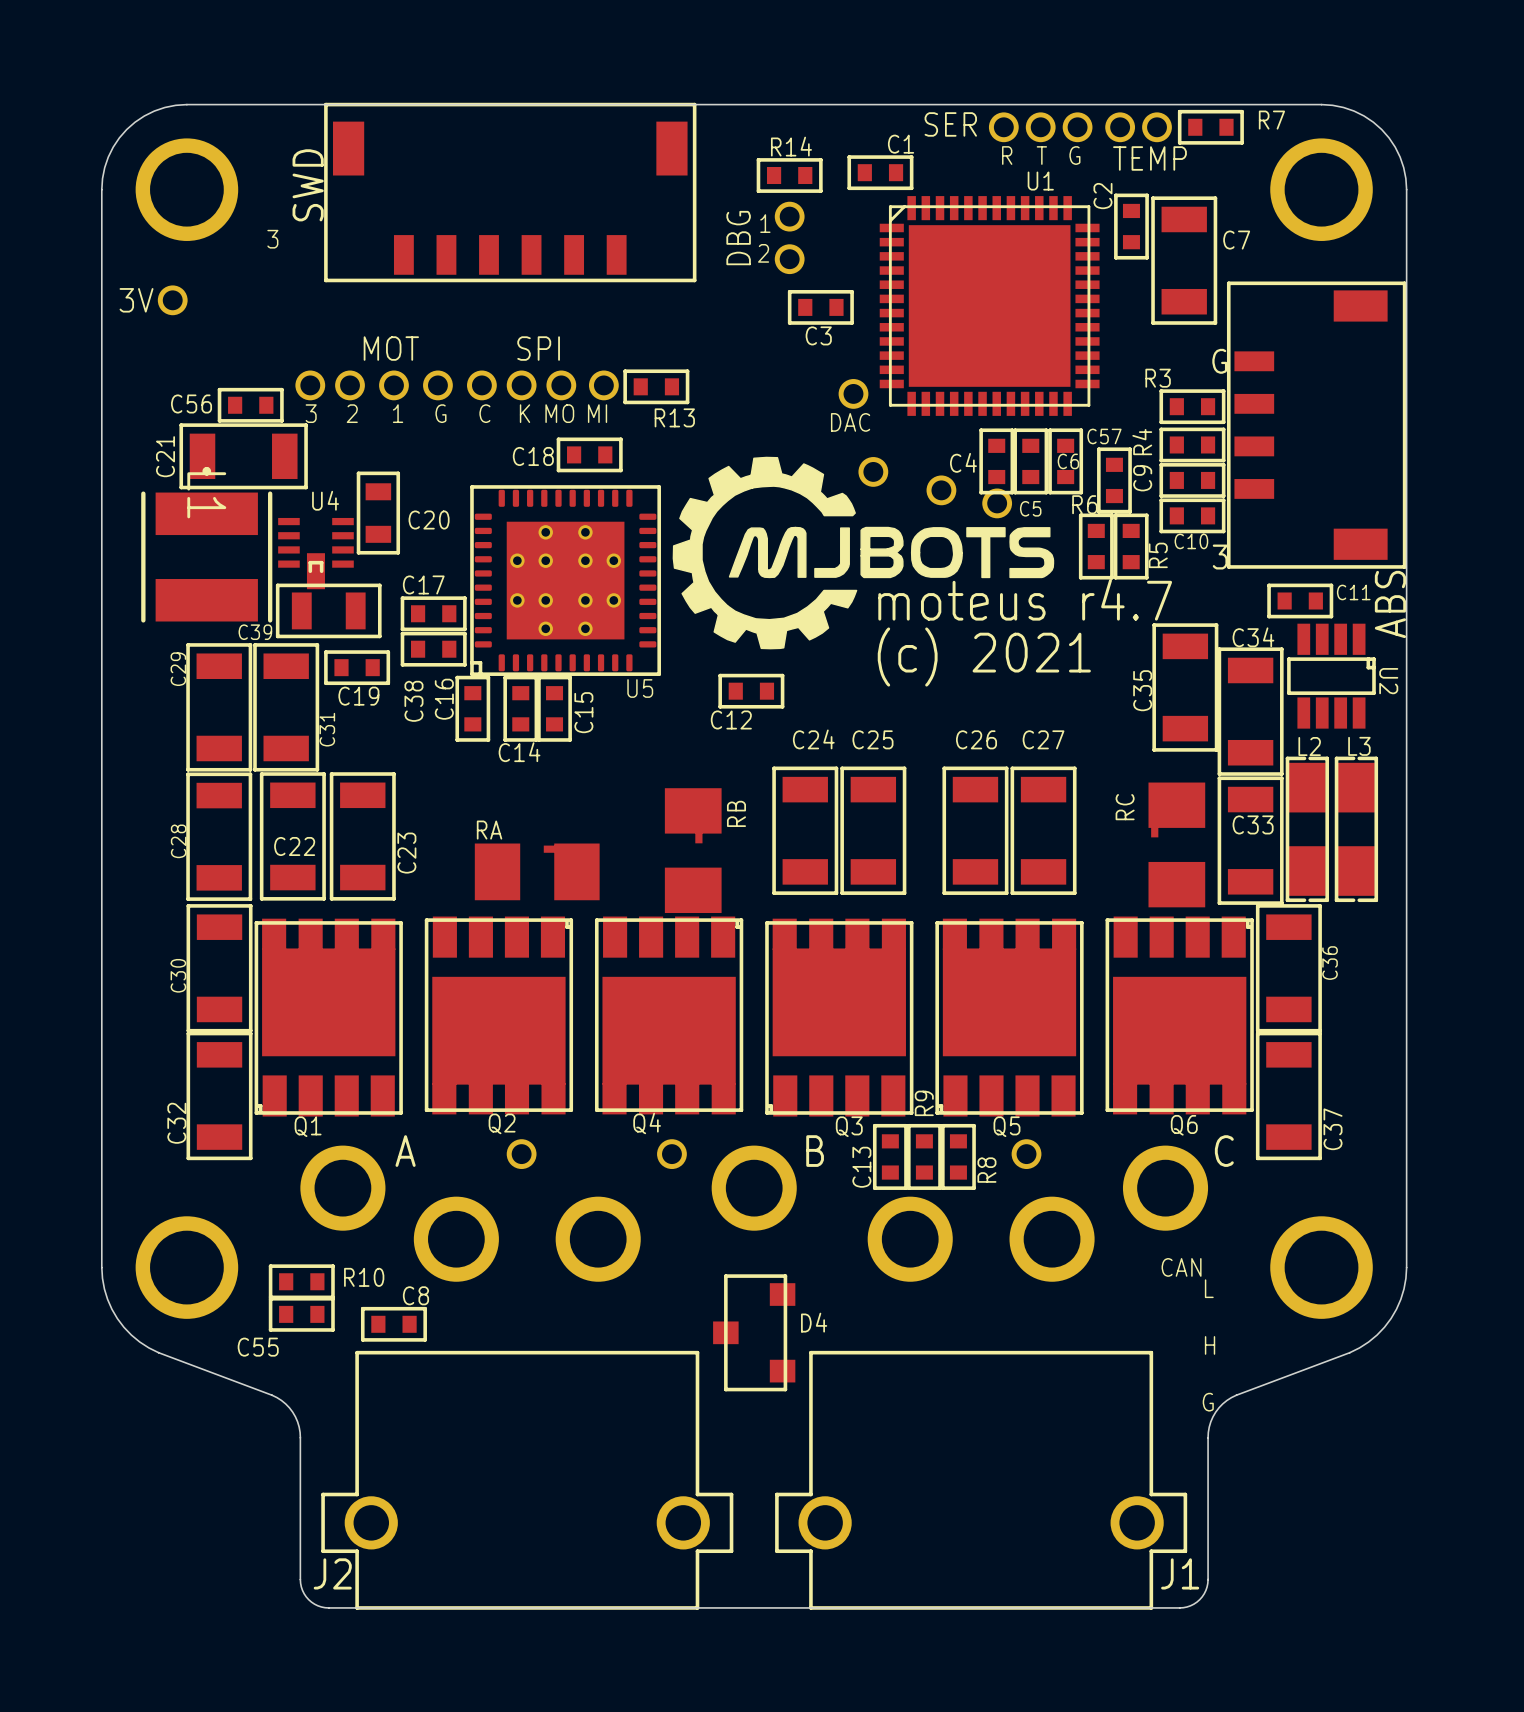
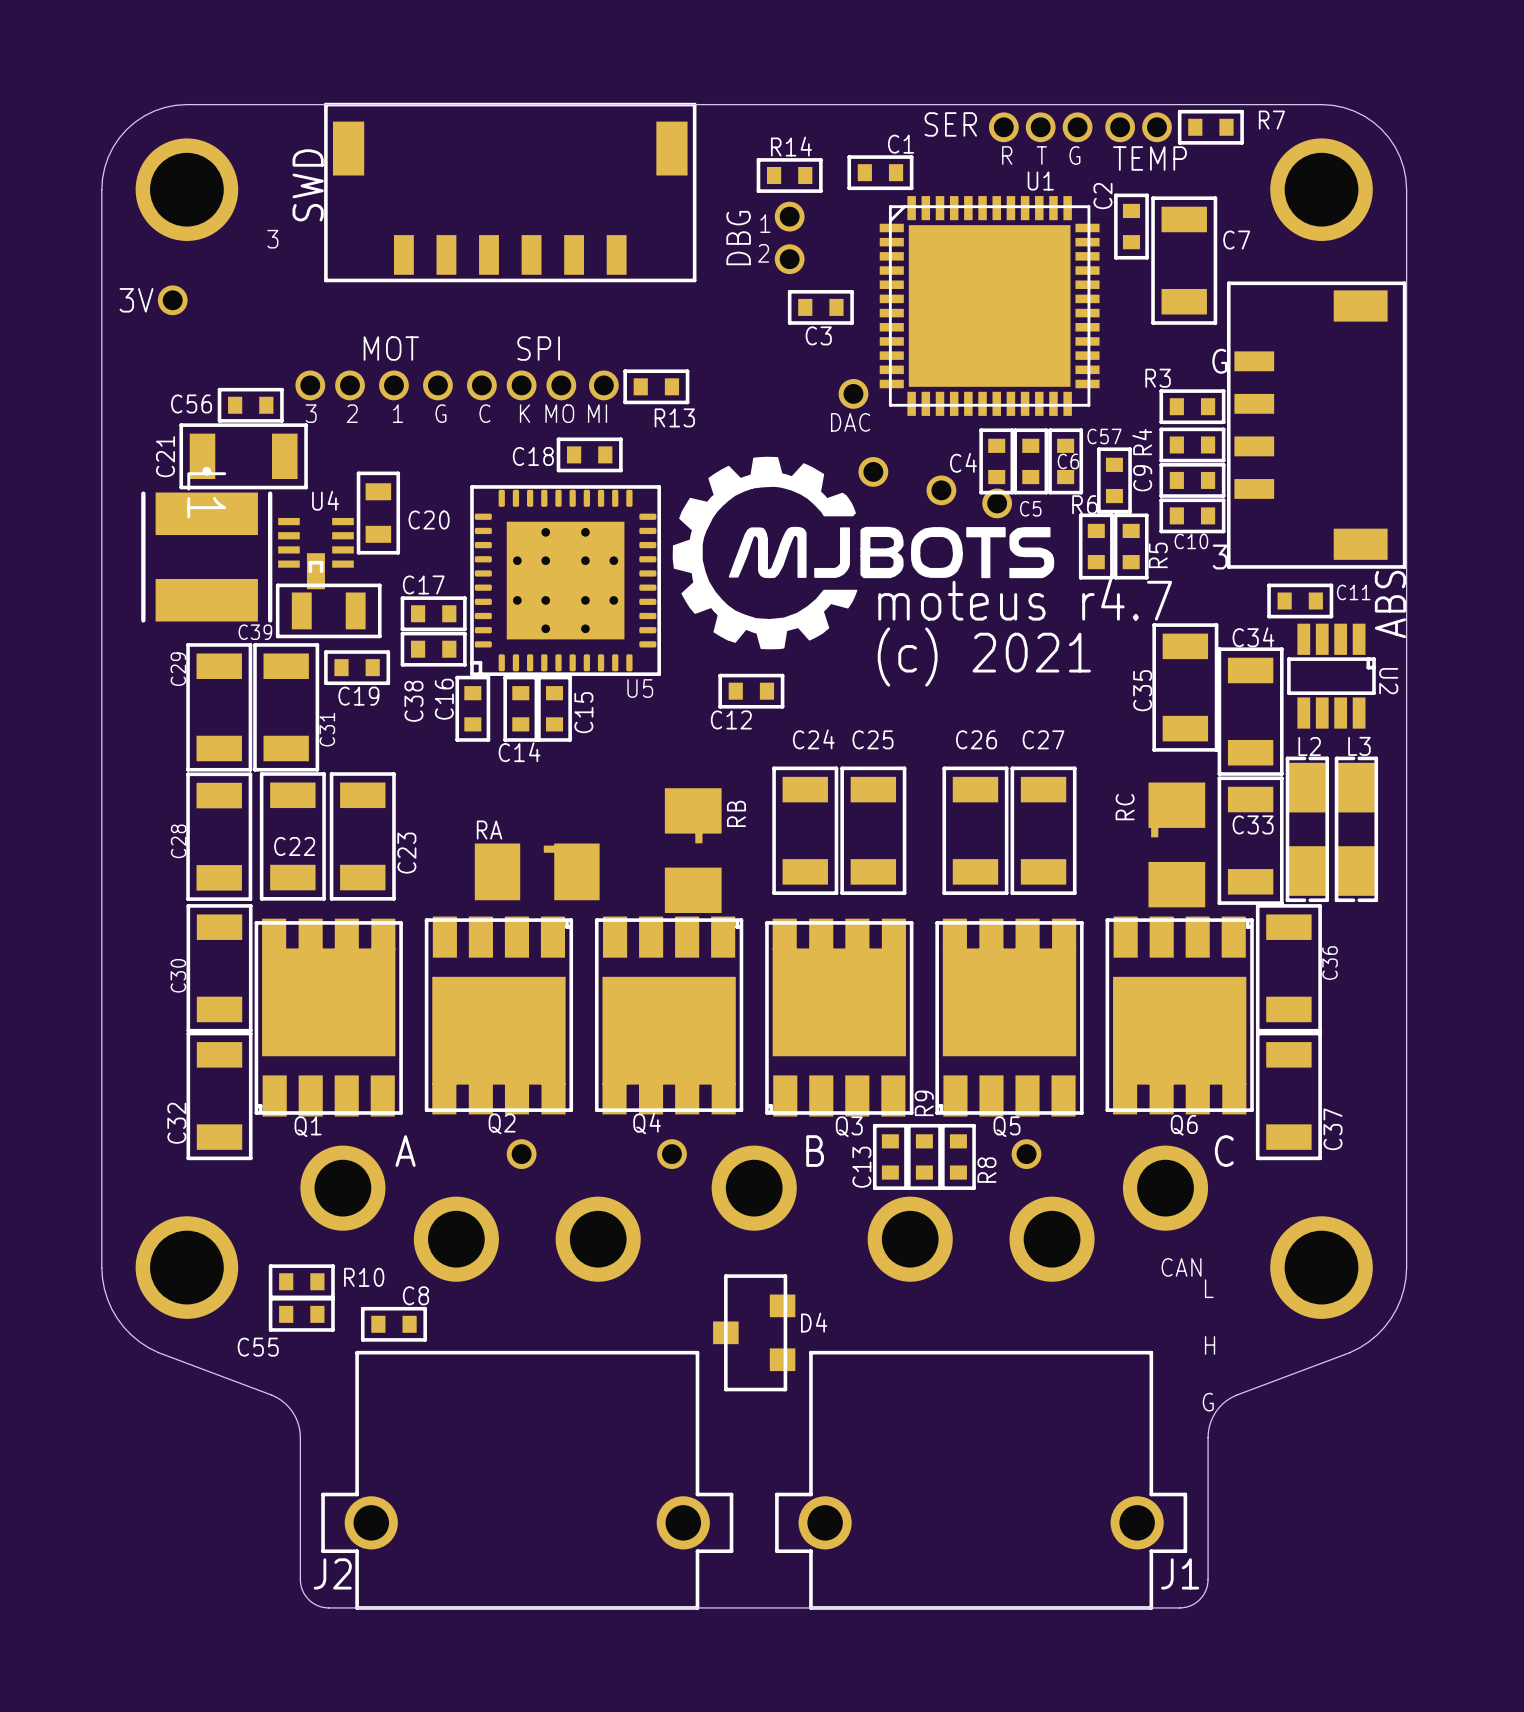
D4 footprint: [713, 1274, 796, 1392] -> [713, 1274, 796, 1392]

